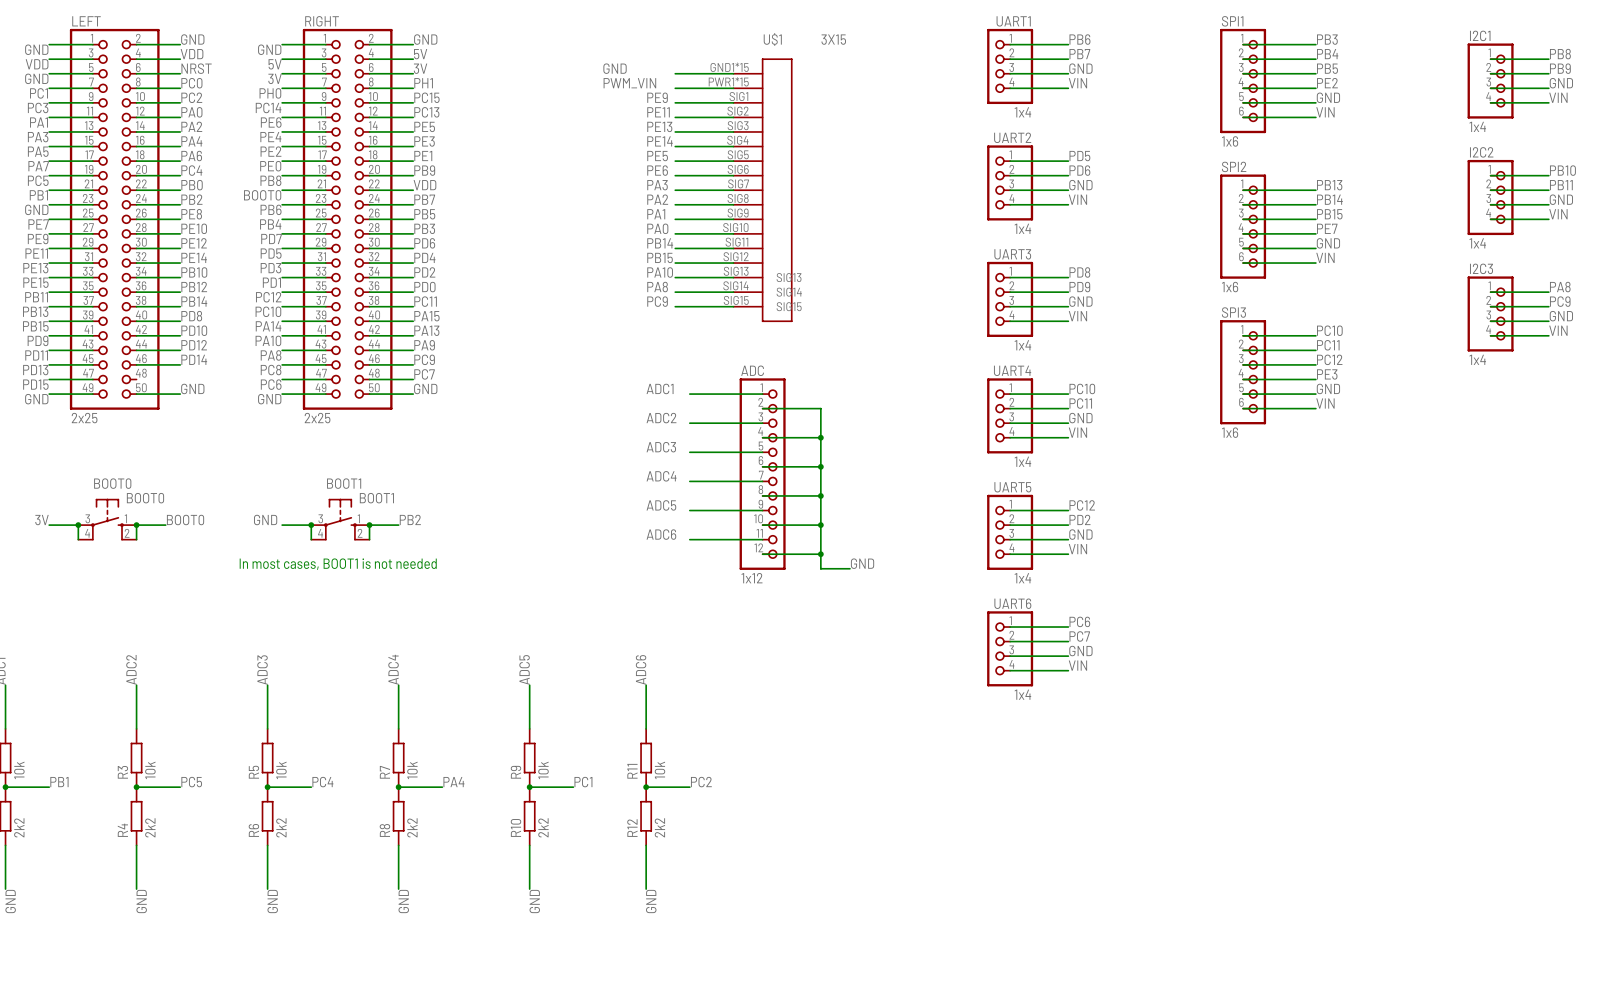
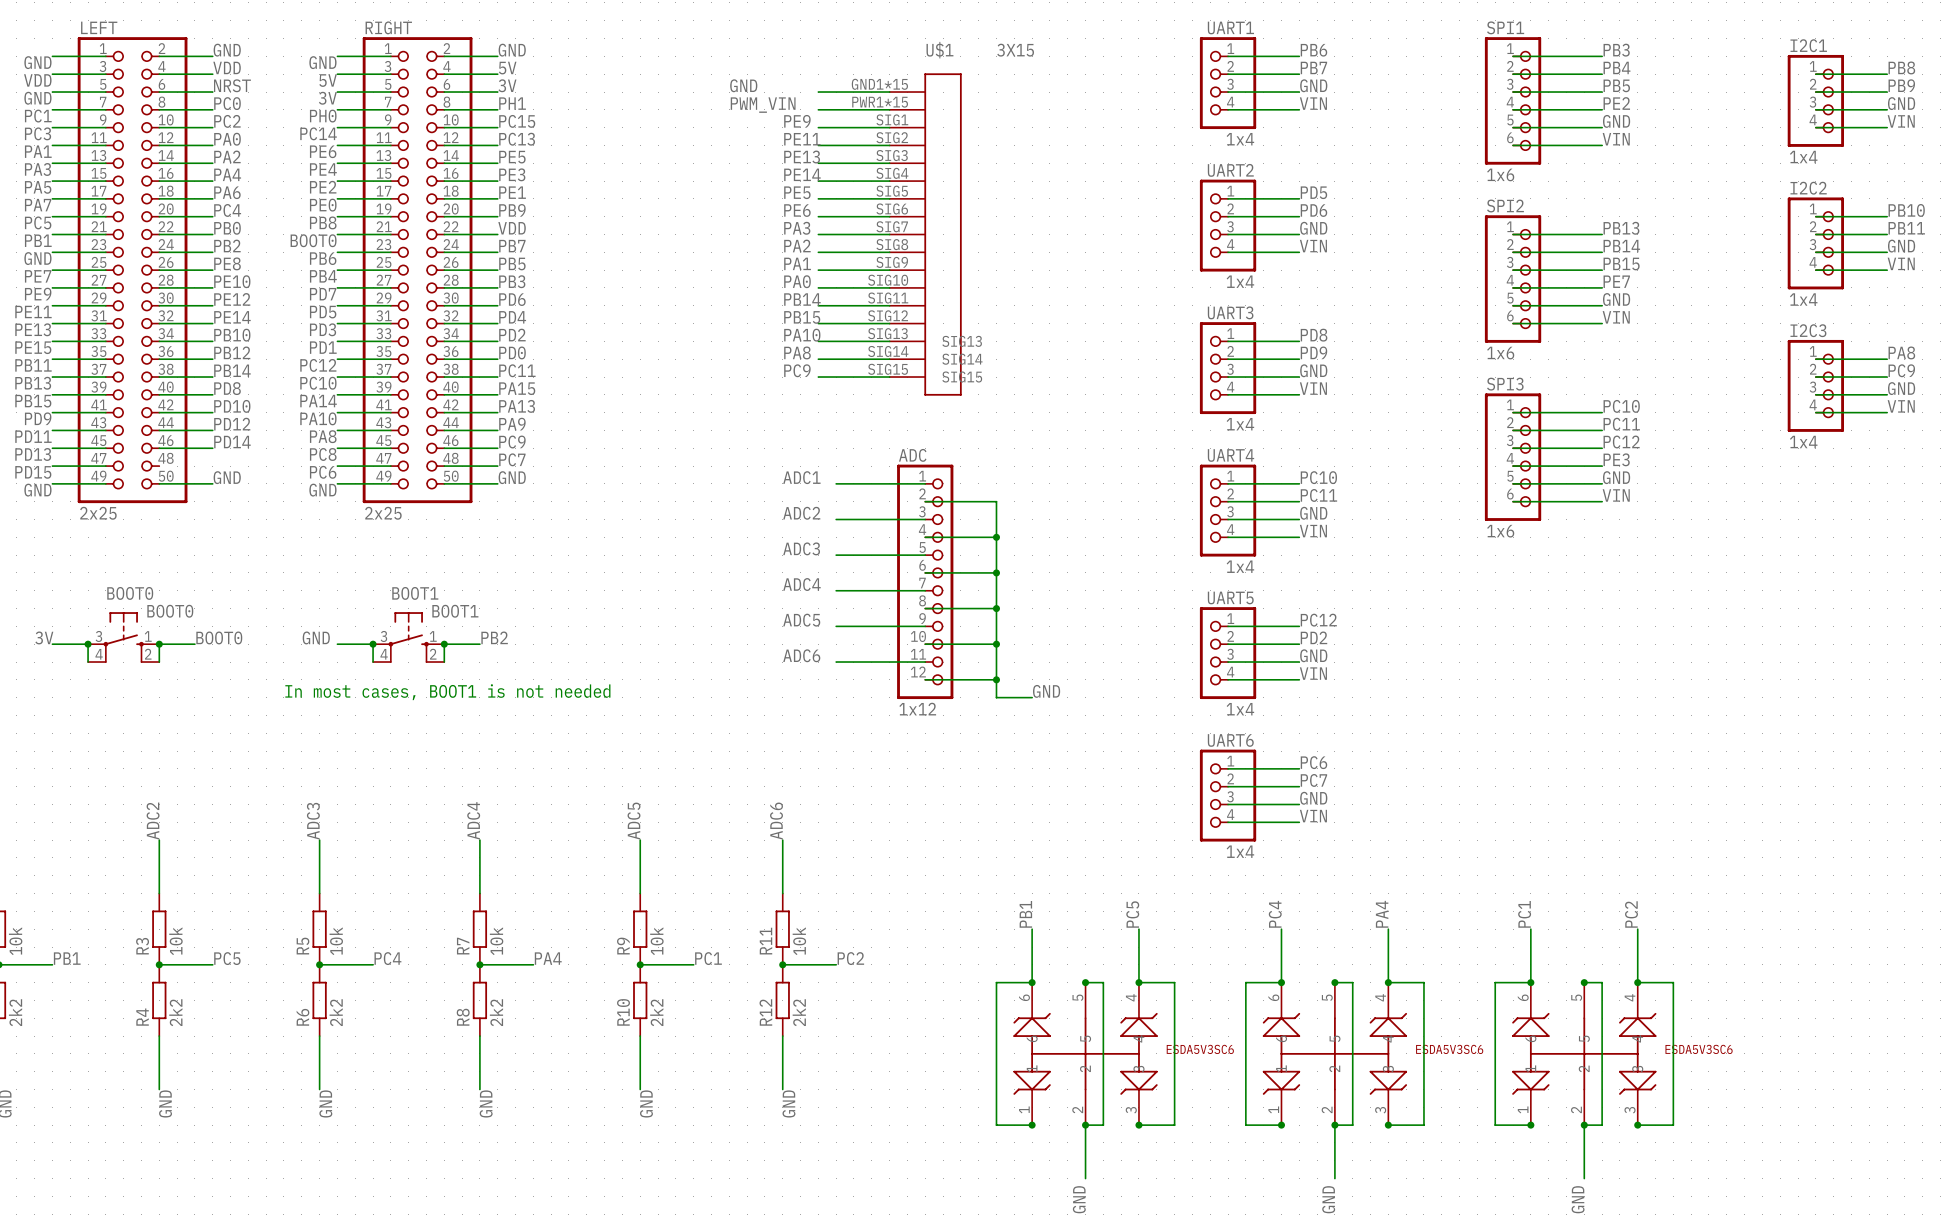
label: none -> PC5 (1132, 914)
label: none -> PC4 (1275, 914)
label: none -> PA4 (1382, 914)
label: none -> PC2 (1631, 914)
label: none -> PB1 (1025, 914)
label: none -> PC1 (1524, 914)
wire: none -> (1032, 929) (1032, 982) (996, 982) (996, 1125) (1032, 1125)
wire: none -> (1138, 929) (1138, 982) (1174, 982) (1174, 1125) (1138, 1125)
wire: none -> (1281, 929) (1281, 982) (1245, 982) (1245, 1125) (1281, 1125)
wire: none -> (1388, 929) (1388, 982) (1423, 982) (1423, 1125) (1388, 1125)
wire: none -> (1530, 929) (1530, 982) (1495, 982) (1495, 1125) (1530, 1125)
wire: none -> (1637, 929) (1637, 982) (1673, 982) (1673, 1125) (1637, 1125)
junction: none -> (1032, 982)
wire: none -> (1085, 982) (1103, 982) (1103, 1125) (1085, 1125) (1085, 1178)
junction: none -> (1085, 982)
junction: none -> (1138, 982)
junction: none -> (1281, 982)
wire: none -> (1334, 982) (1352, 982) (1352, 1125) (1334, 1125) (1334, 1178)
junction: none -> (1334, 982)
junction: none -> (1388, 982)
junction: none -> (1530, 982)
wire: none -> (1584, 982) (1602, 982) (1602, 1125) (1584, 1125) (1584, 1178)
junction: none -> (1584, 982)
junction: none -> (1637, 982)
part: none -> (1085, 1053)
part: none -> (1334, 1053)
part: none -> (1584, 1053)
junction: none -> (1032, 1125)
junction: none -> (1085, 1125)
junction: none -> (1138, 1125)
junction: none -> (1281, 1125)
junction: none -> (1334, 1125)
junction: none -> (1388, 1125)
junction: none -> (1530, 1125)
junction: none -> (1584, 1125)
junction: none -> (1637, 1125)
label: none -> GND (1079, 1199)
label: none -> GND (1328, 1199)
label: none -> GND (1578, 1199)

